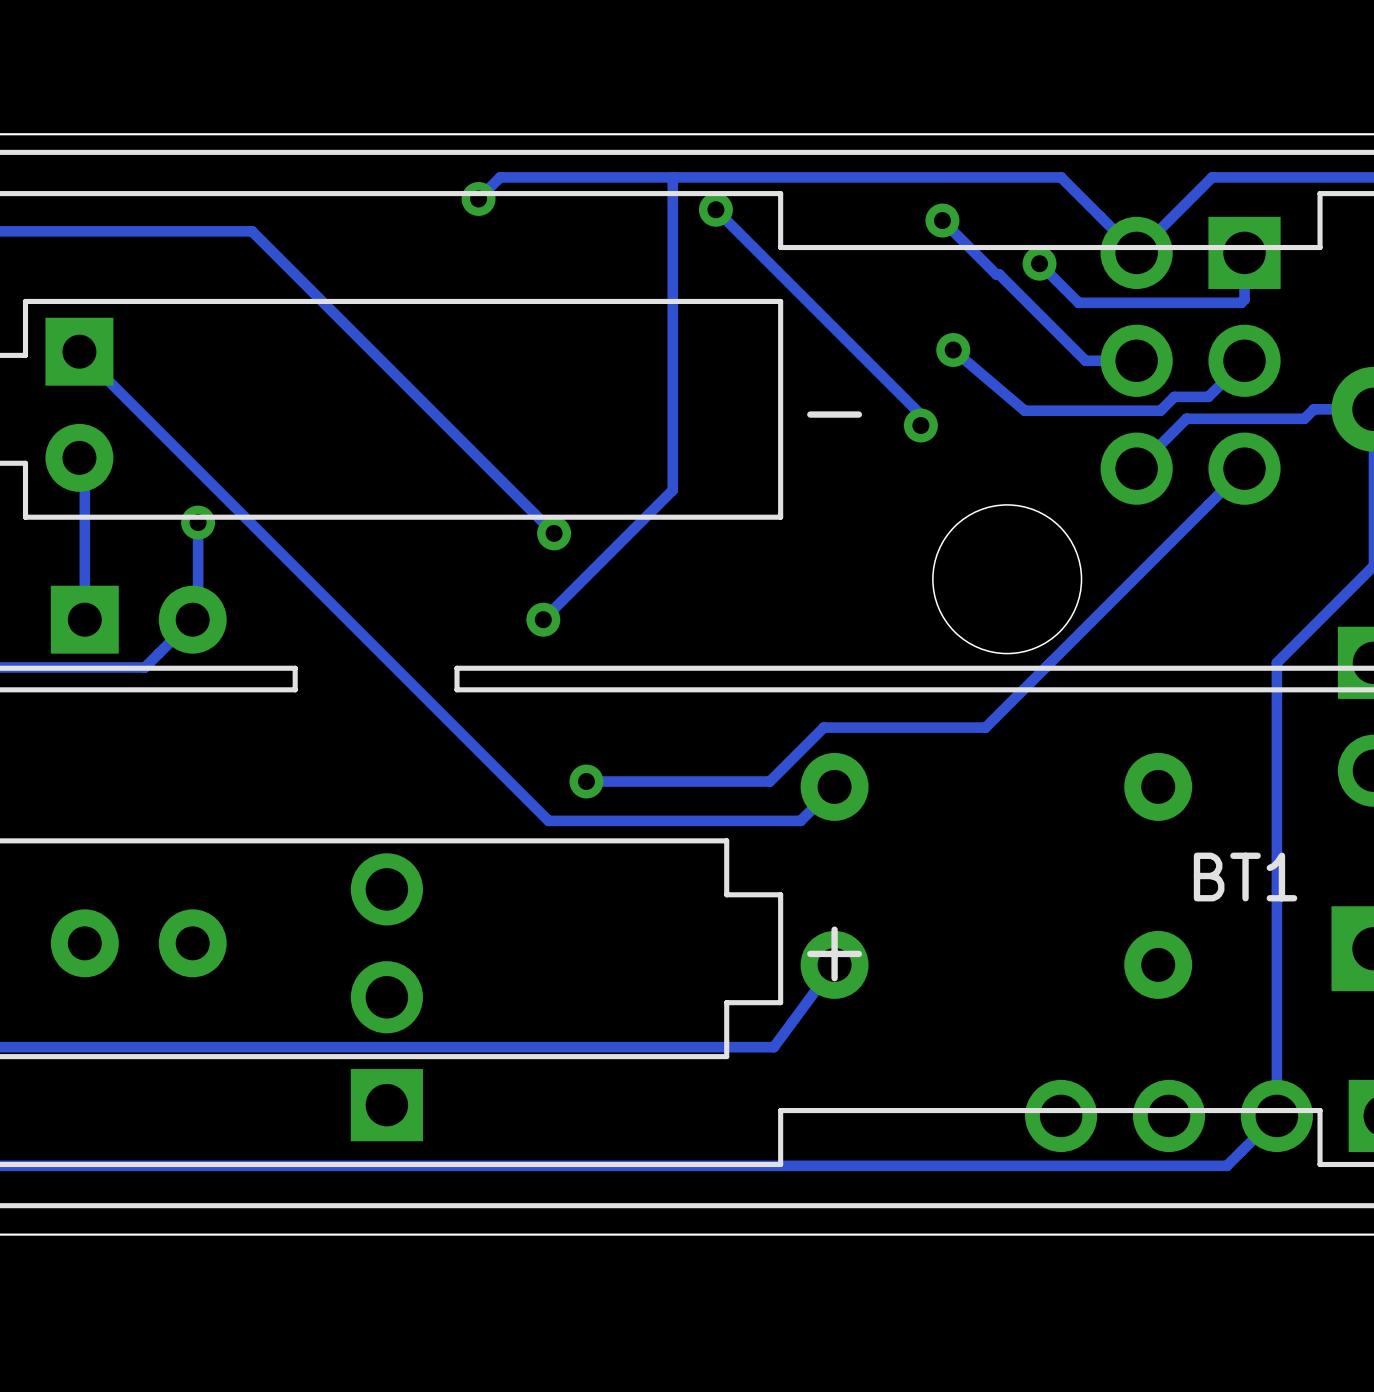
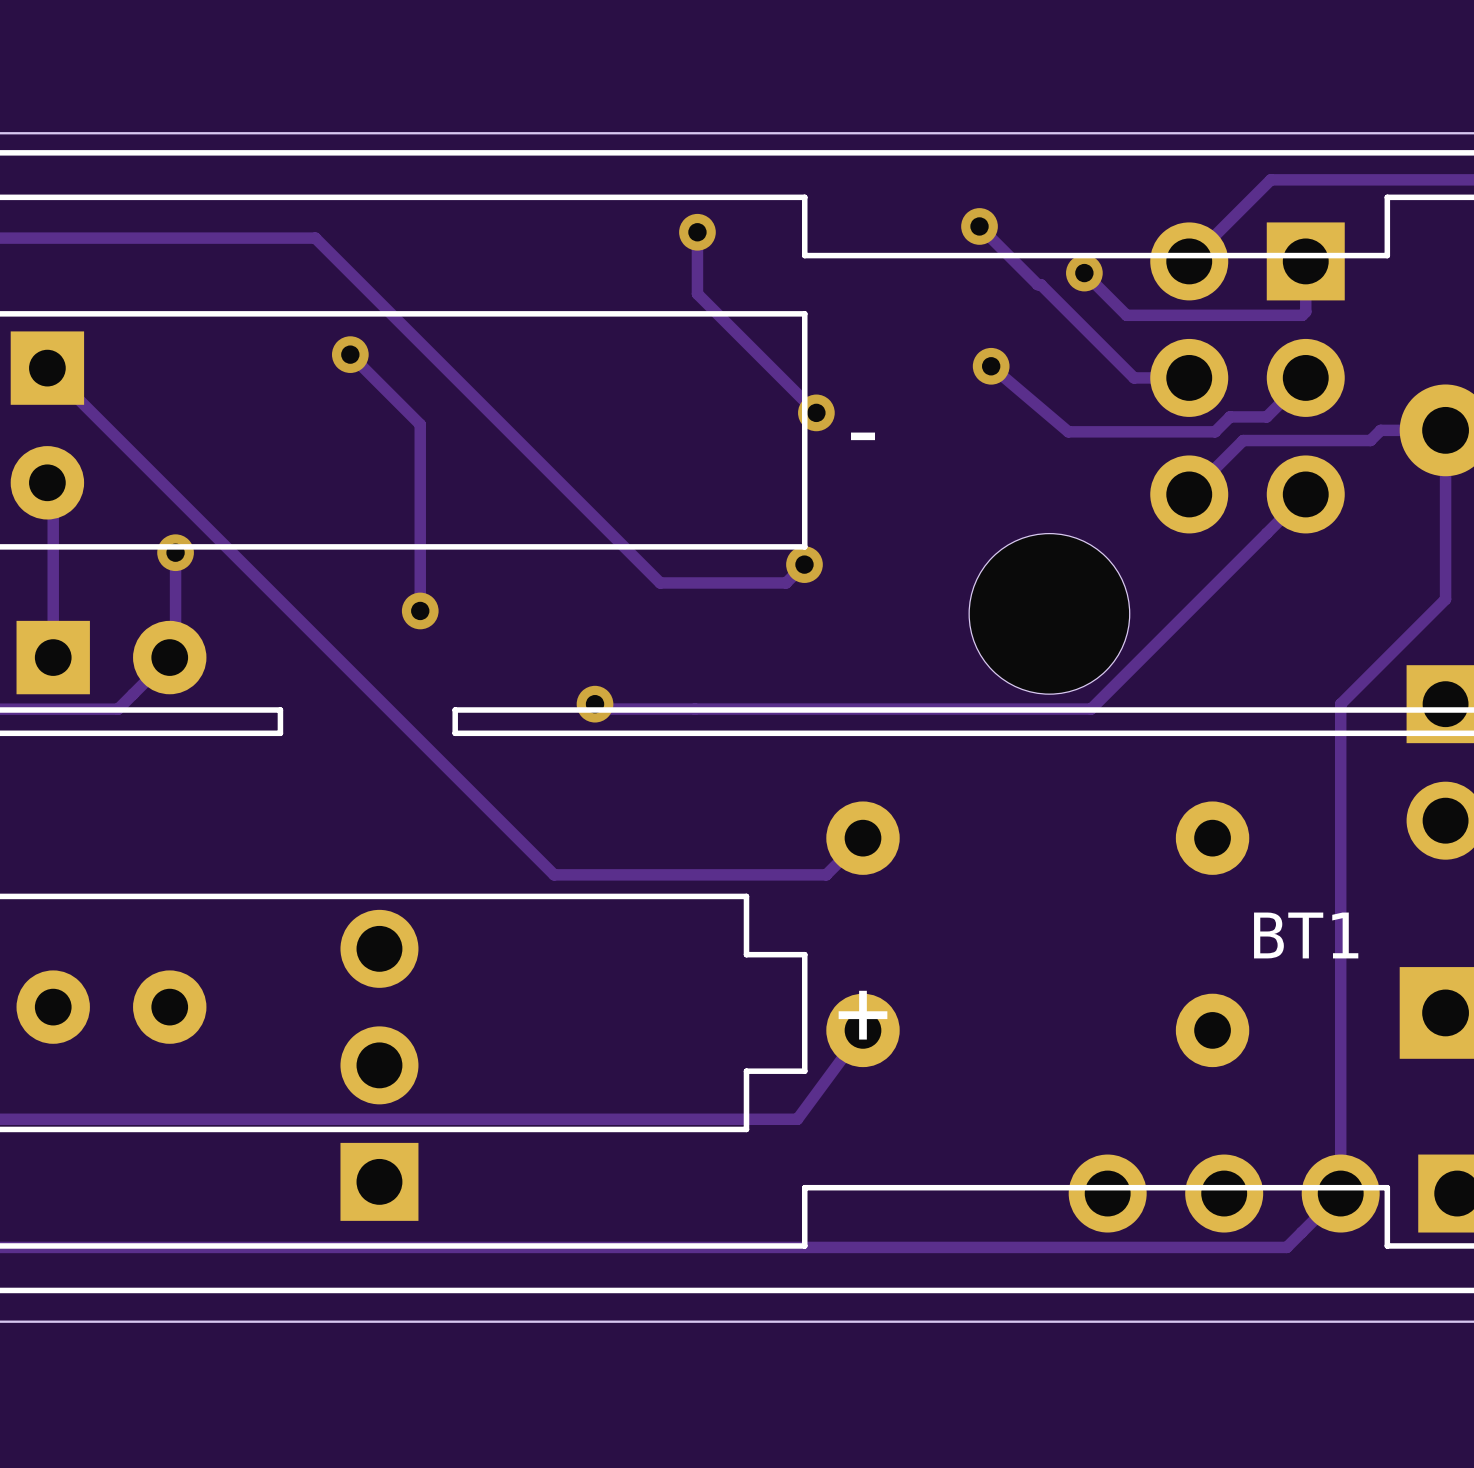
track: (672, 177) (672, 490) (543, 619) -> none
track: (478, 198) (500, 177) (1061, 177) (1136, 252) -> none
via: (478, 198) -> none
track: (715, 209) (920, 414) (920, 425) -> none
via position: (715, 209) -> (697, 232)
track: none -> (697, 232) (697, 293) (816, 412)
track: (252, 231) (359, 339) -> (233, 238) (315, 238) (660, 582) (786, 582) (804, 564)
via: none -> (350, 354)
via: none -> (816, 412)
track: (424, 403) (554, 533) -> (420, 424) (420, 610)
via: (920, 425) -> none
via: (554, 533) -> none
via: none -> (804, 564)
via: none -> (420, 610)
via: (543, 619) -> none
via: none -> (595, 704)
track: (1045, 667) (985, 727) (823, 727) (769, 781) (586, 781) -> (1091, 709) (599, 709) (595, 704)
via: (586, 781) -> none

